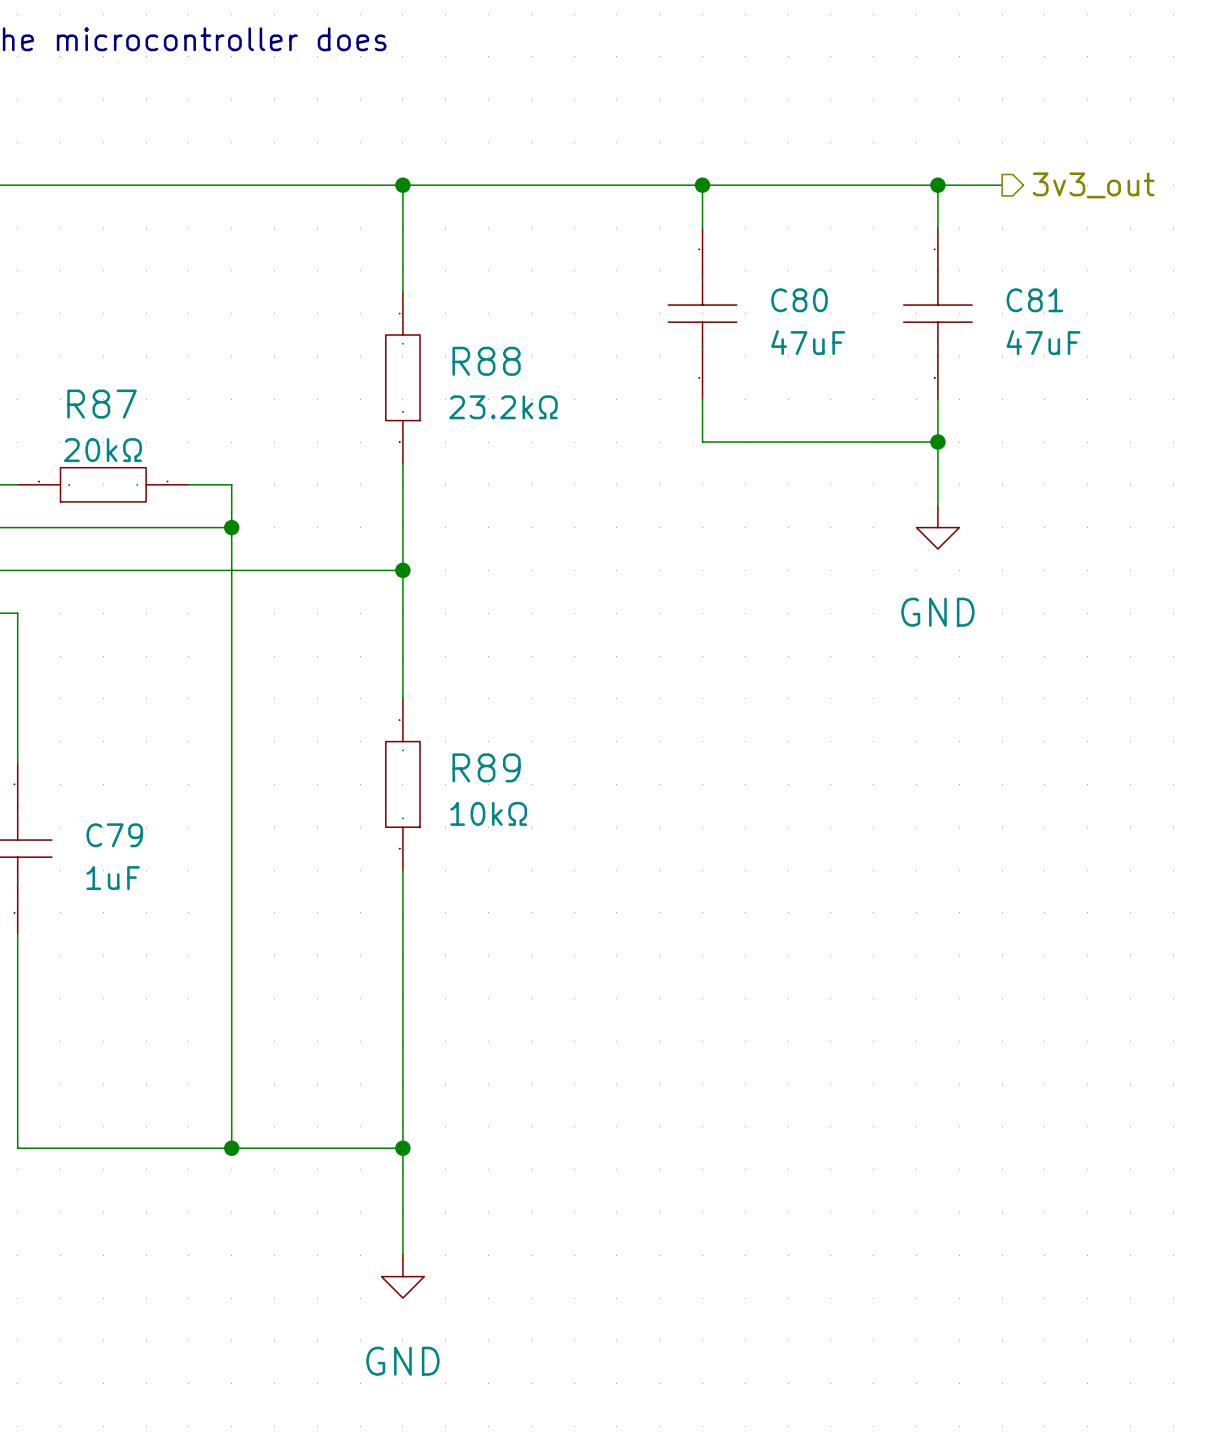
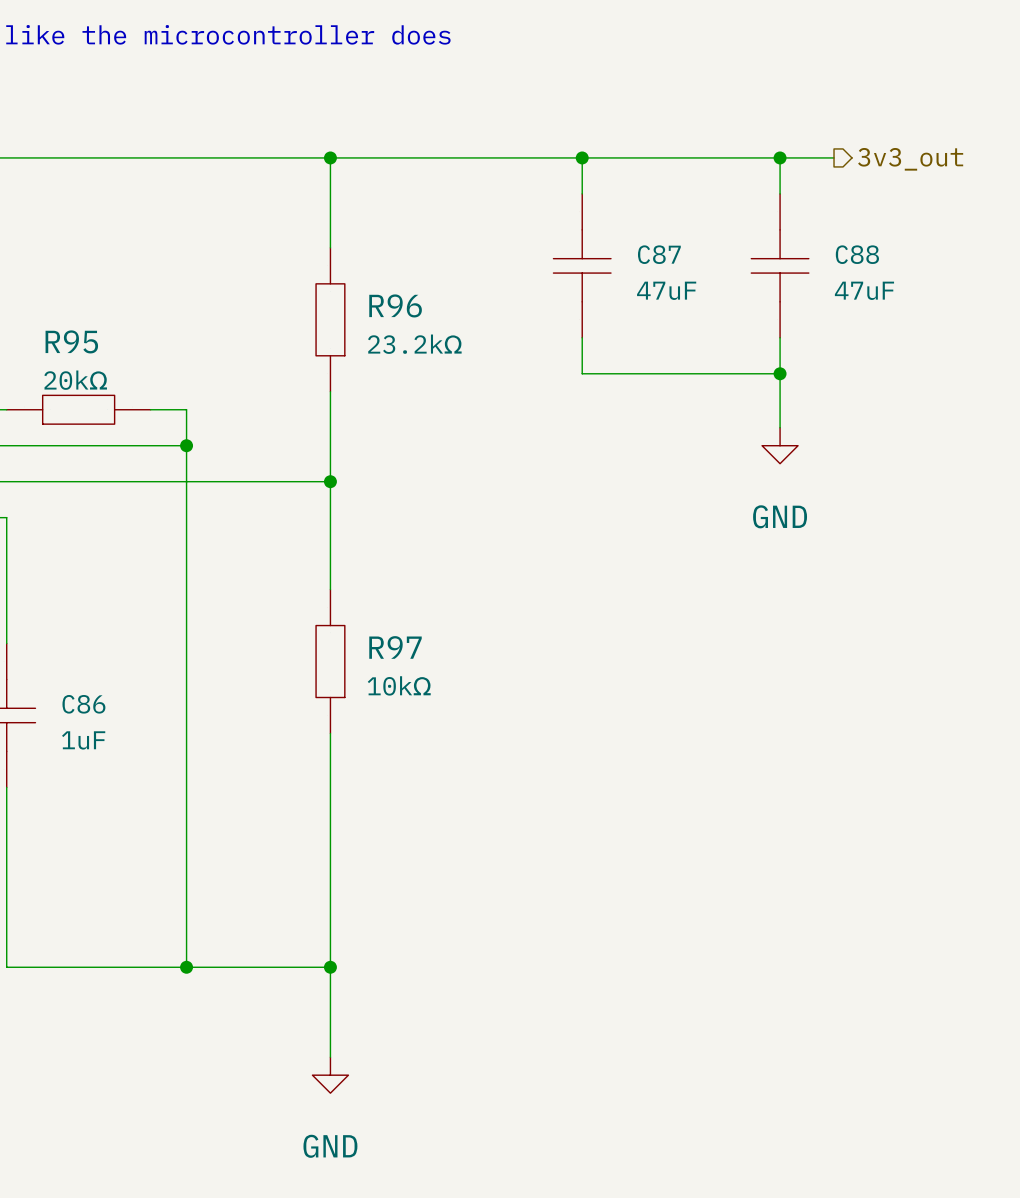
C80 name: C80 (799, 300) -> C87 (659, 254)
C81 name: C81 (1034, 300) -> C88 (857, 254)
R88 name: R88 (486, 361) -> R96 (395, 305)
R87 name: R87 (102, 404) -> R95 (71, 341)
R89 name: R89 (486, 767) -> R97 (395, 647)
C79 name: C79 (114, 835) -> C86 (83, 704)

